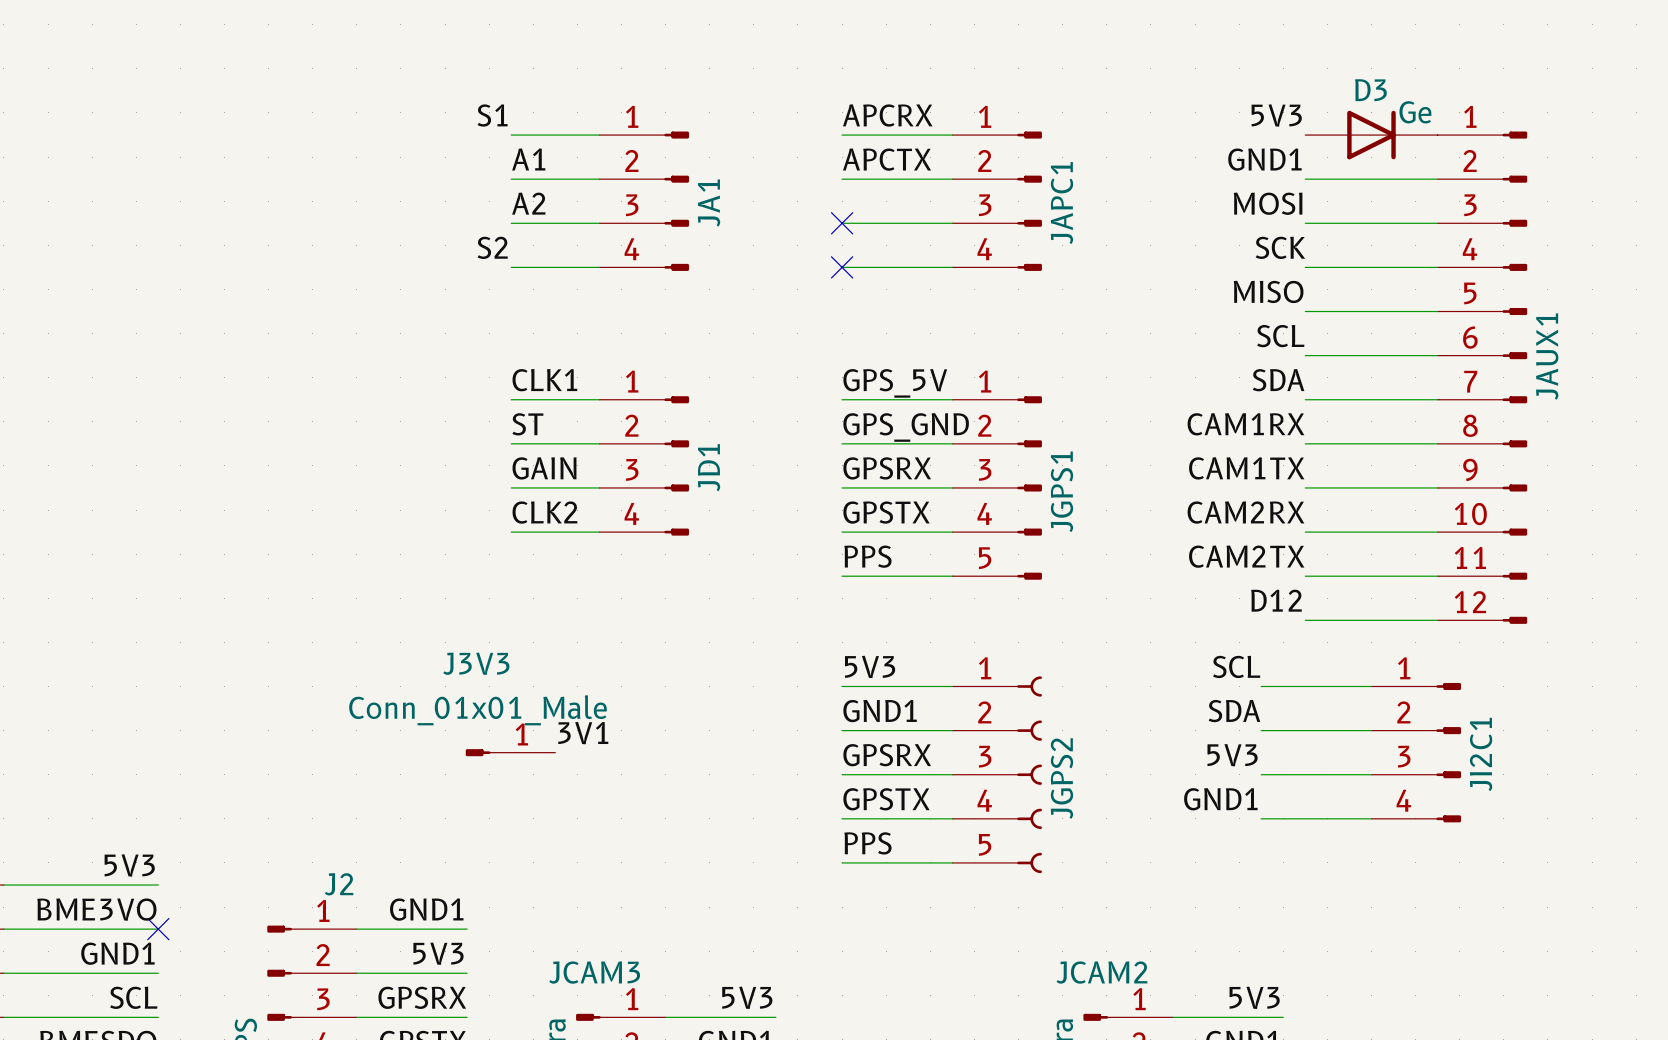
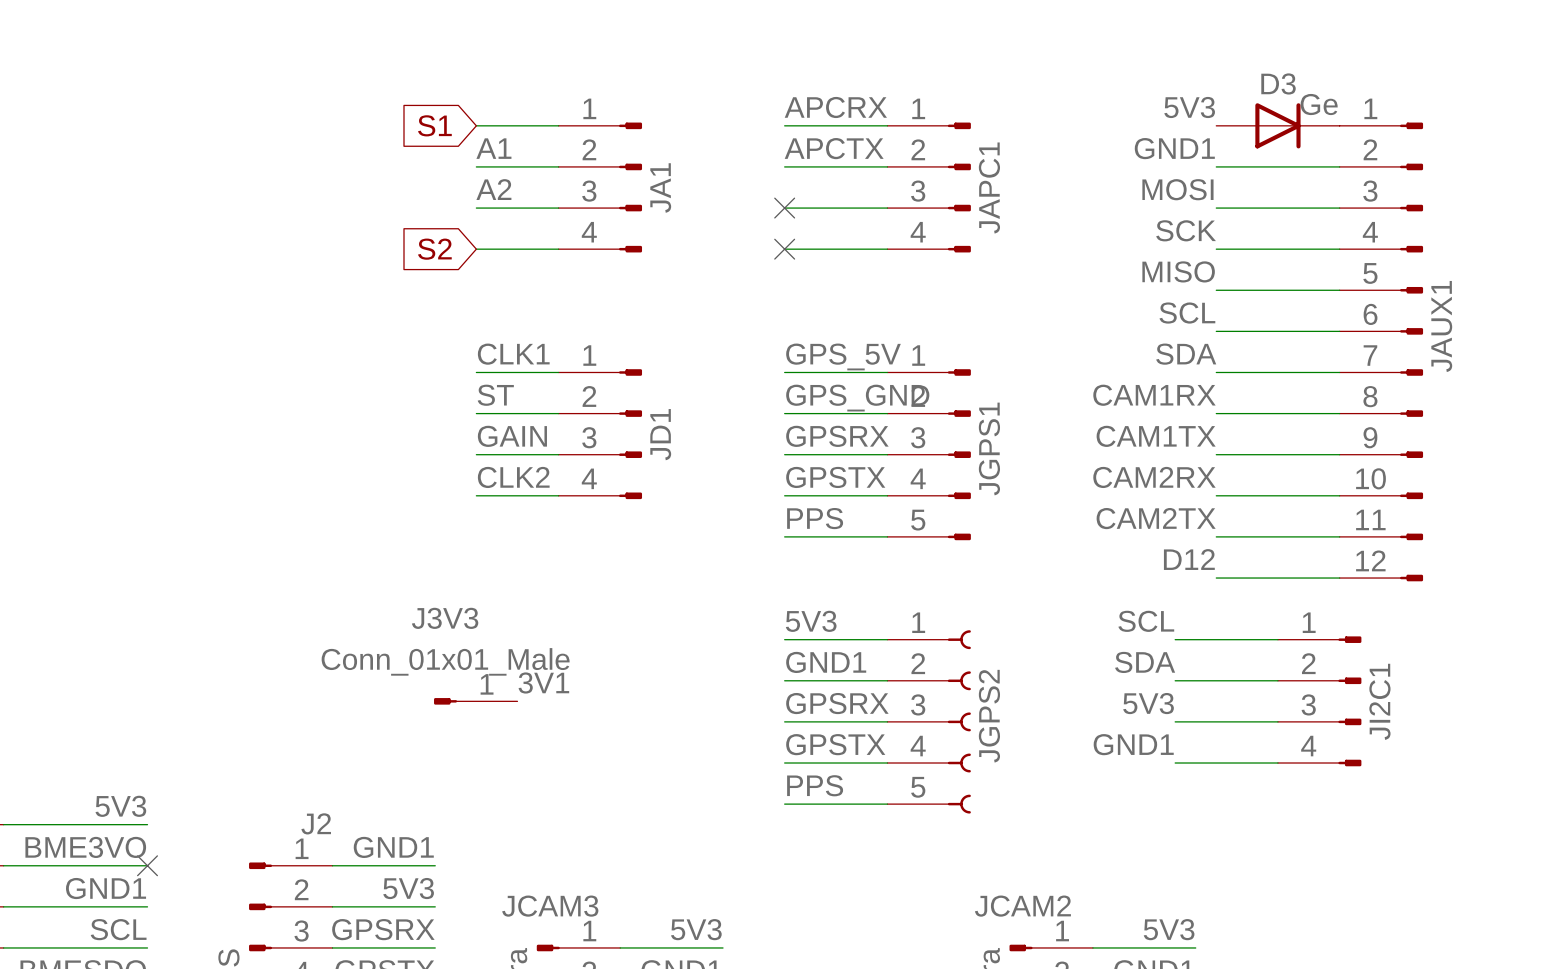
label: S1 (492, 115) -> none
global label: none -> S1 (434, 125)
label: S2 (492, 247) -> none
global label: none -> S2 (434, 249)

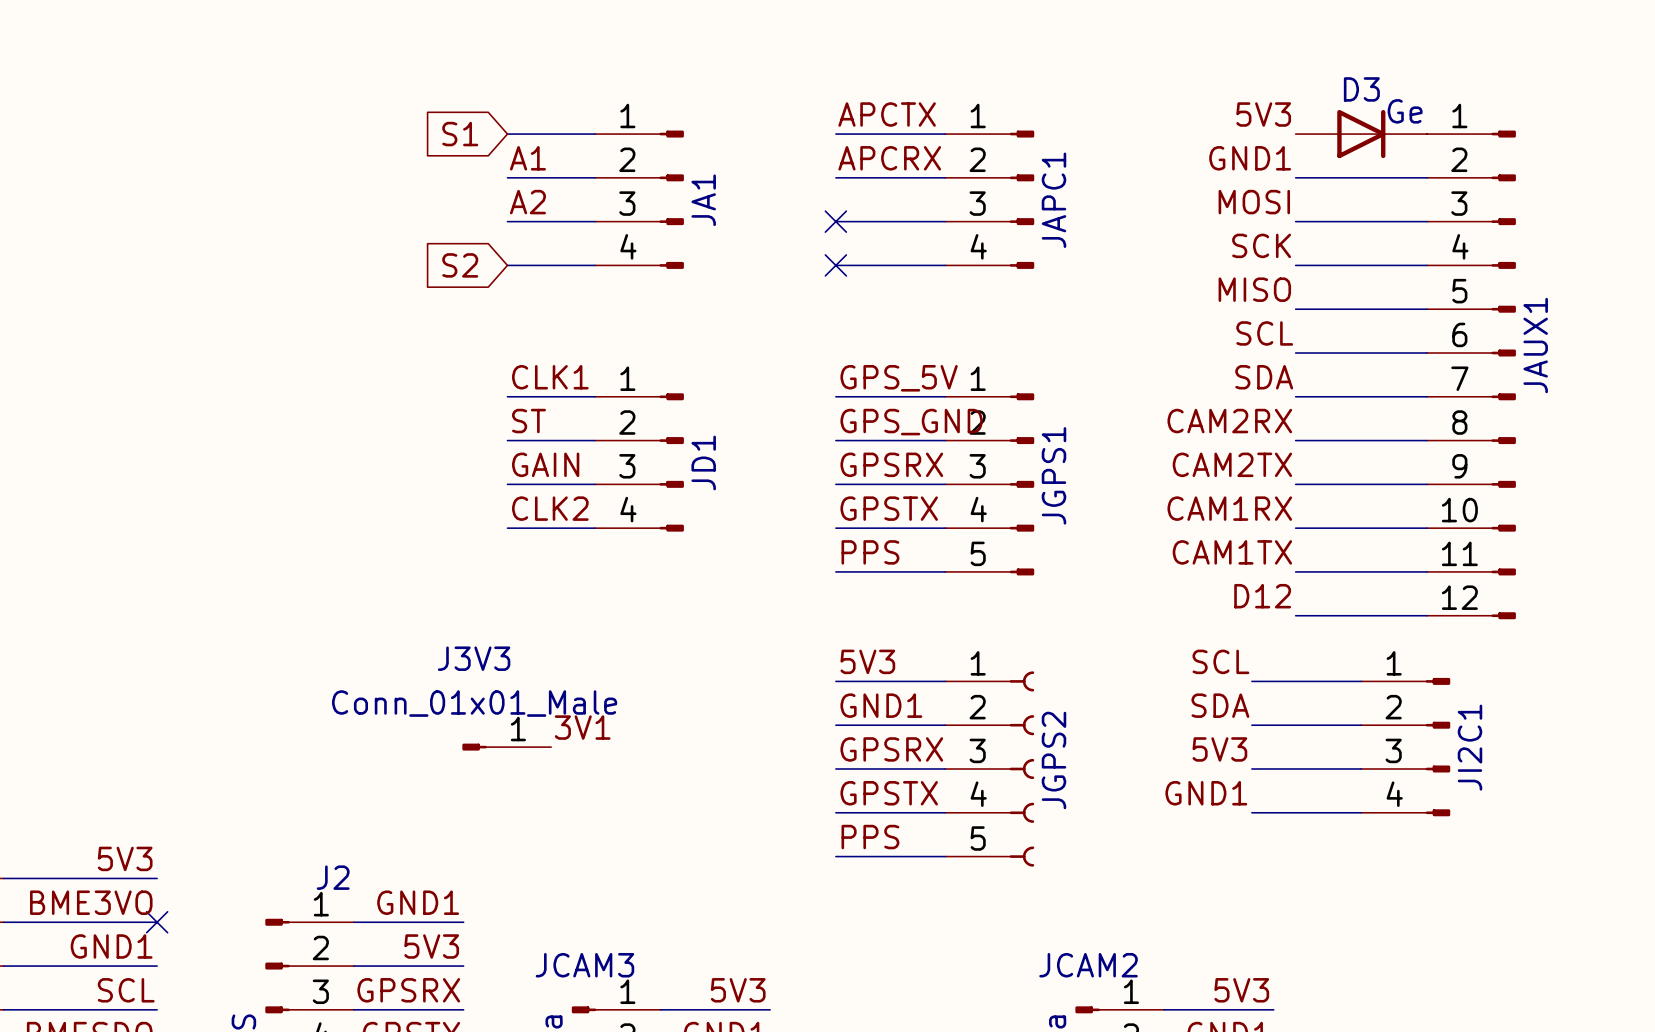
label: APCRX (835, 107) -> APCTX (887, 114)
label: APCTX (834, 148) -> APCRX (889, 158)
label: CAM1RX (1154, 395) -> CAM2RX (1229, 421)
label: CAM1TX (1156, 436) -> CAM2TX (1232, 464)
label: CAM2RX (1154, 477) -> CAM1RX (1229, 508)
label: CAM2TX (1156, 518) -> CAM1TX (1232, 552)

